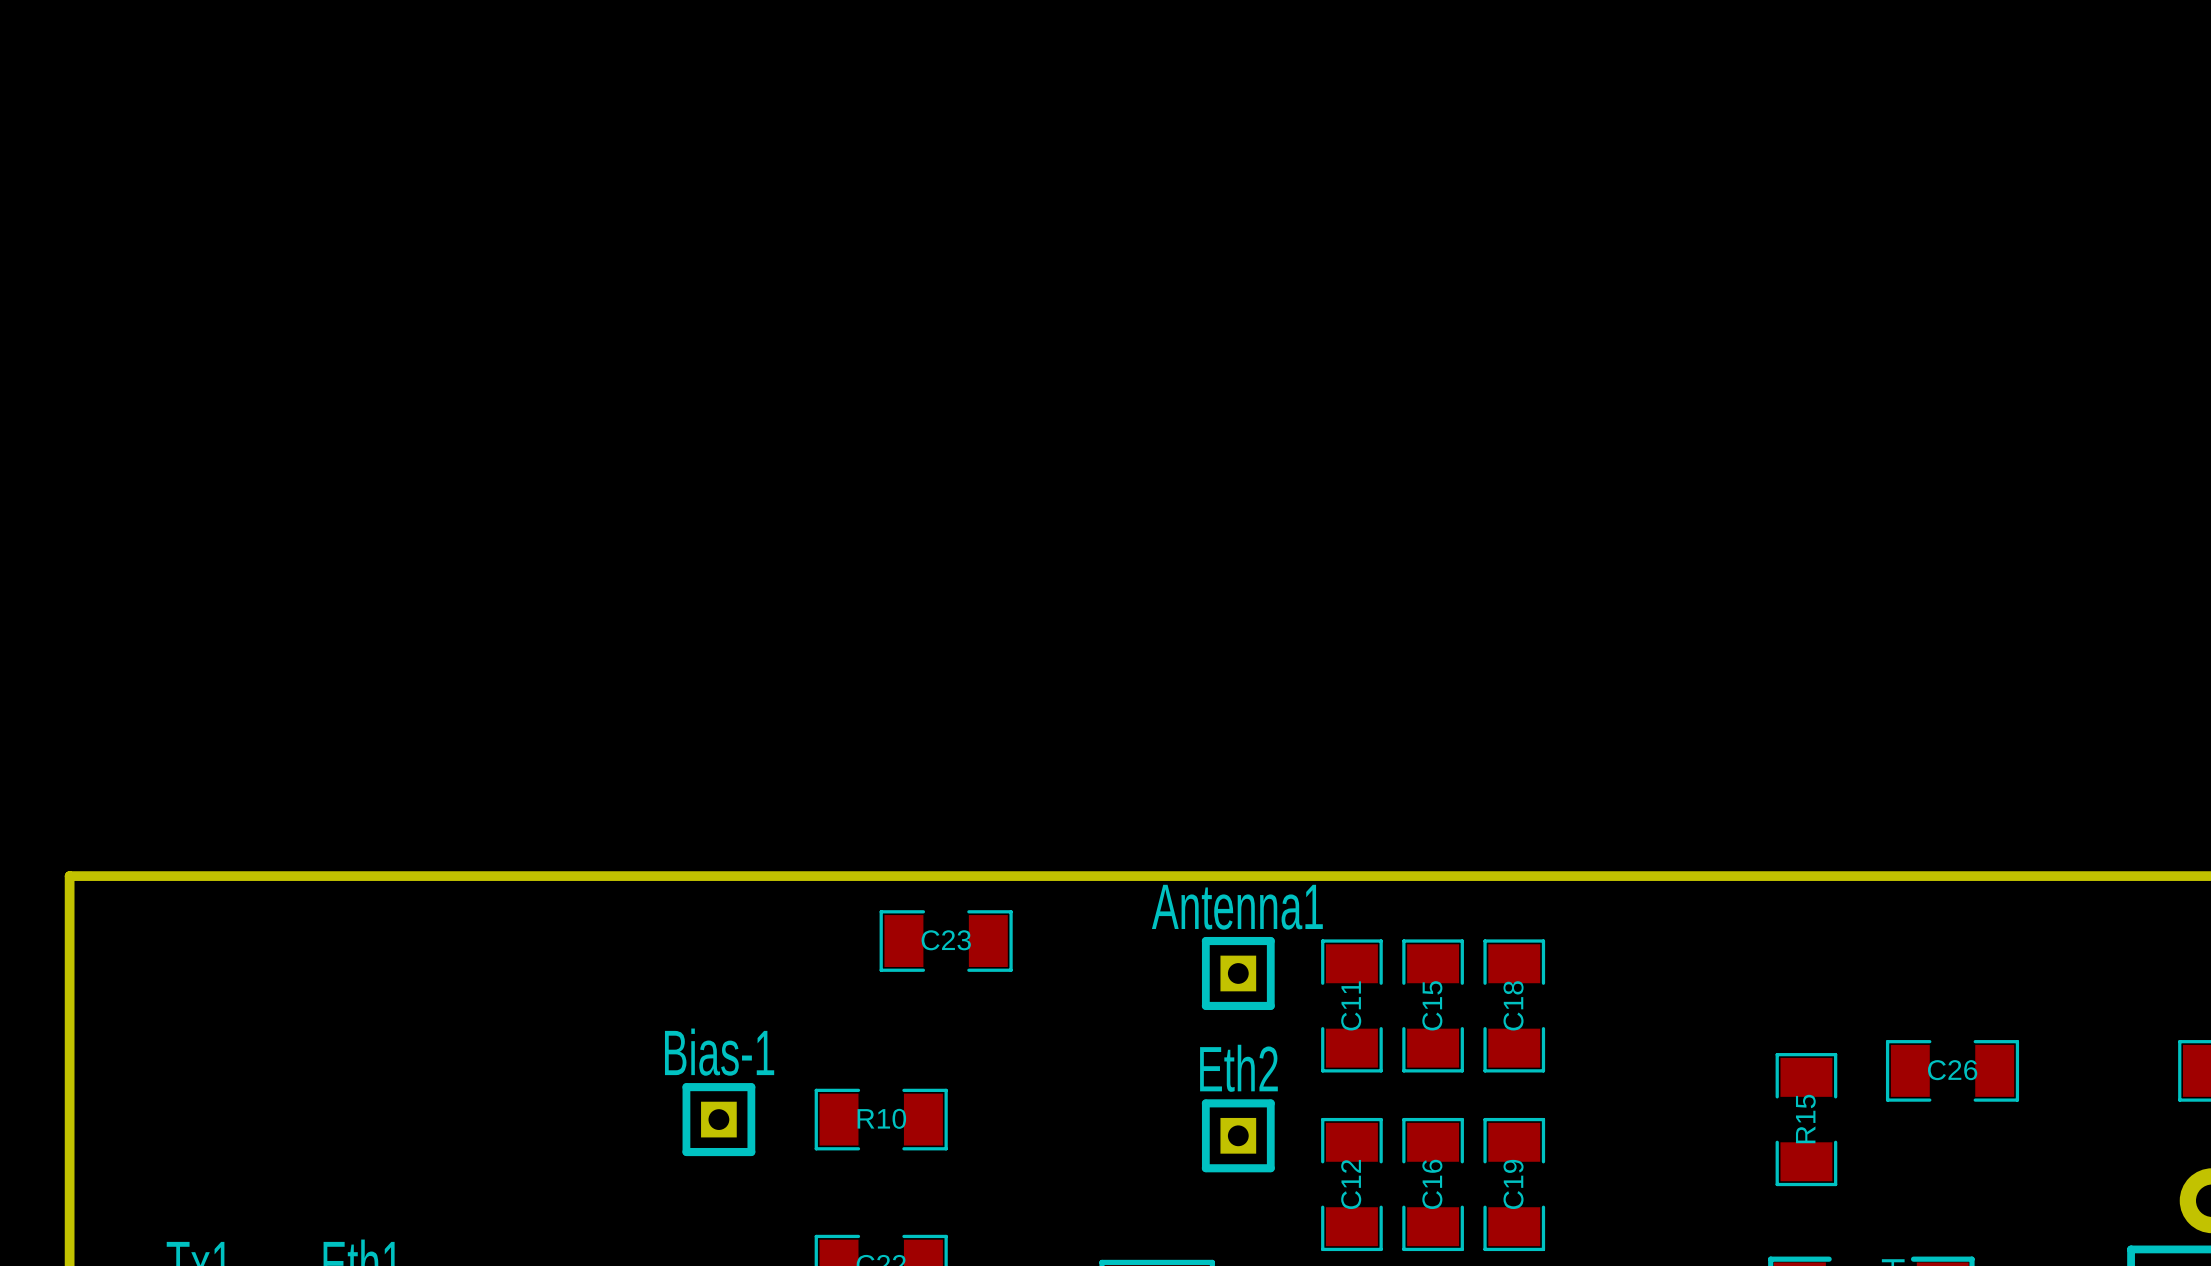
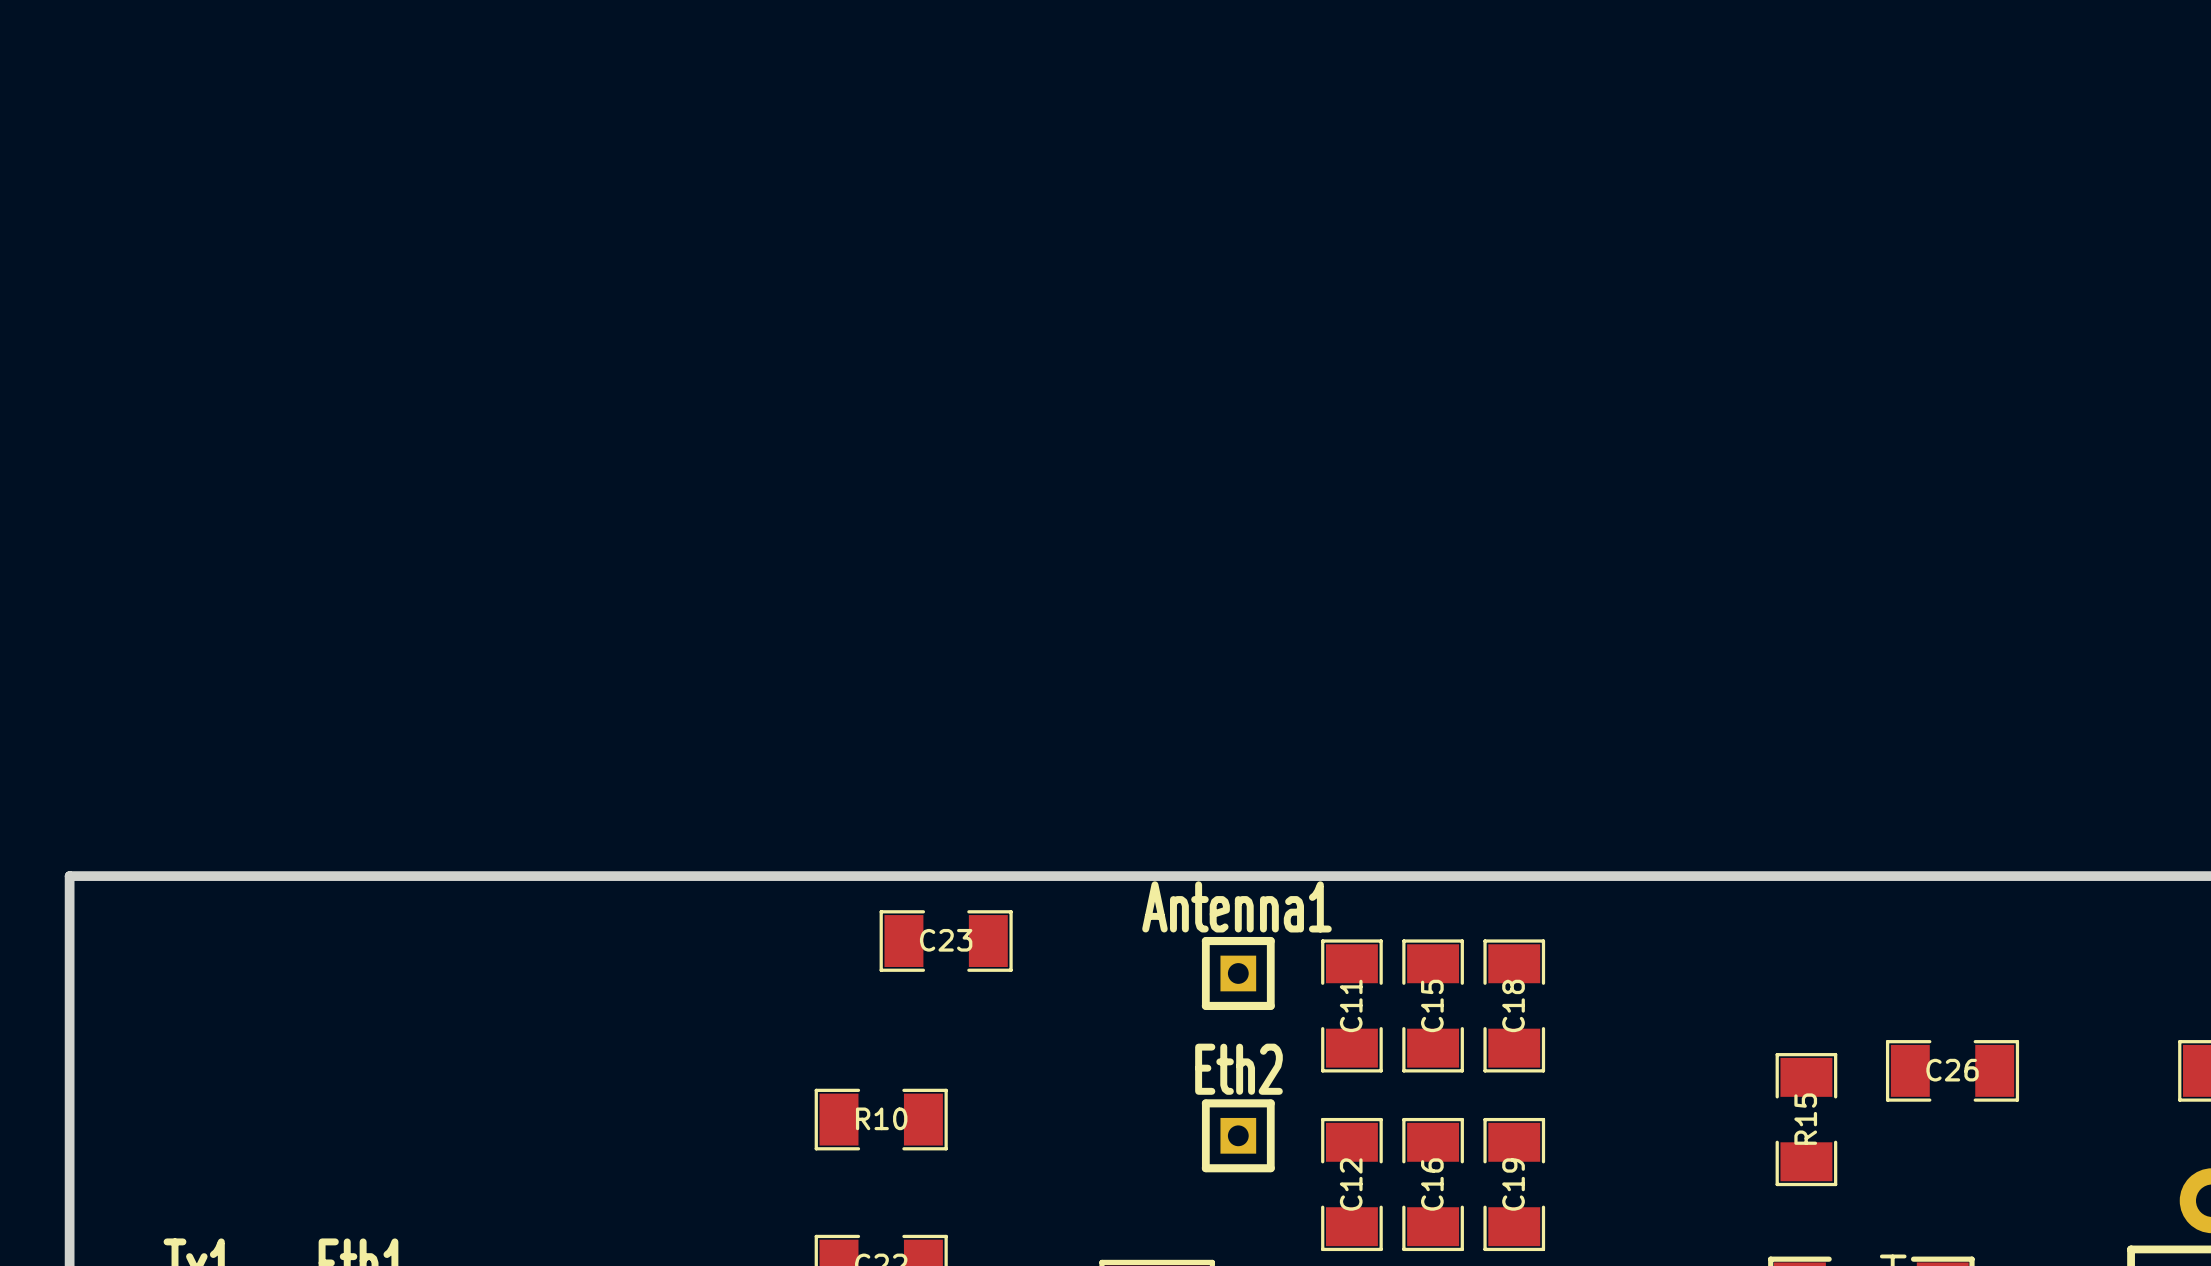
Bias-1: (718, 1119) -> none

